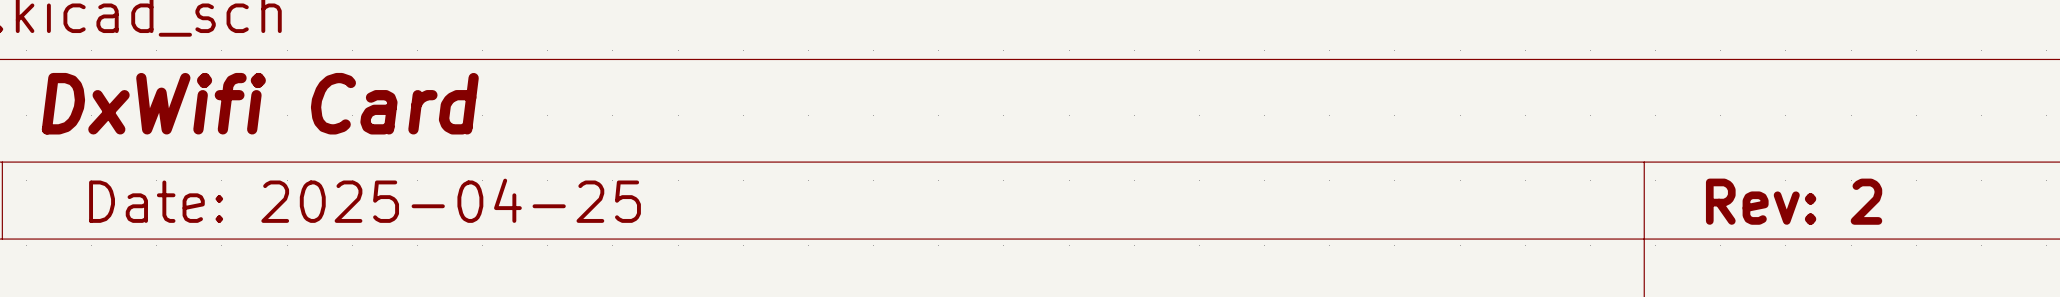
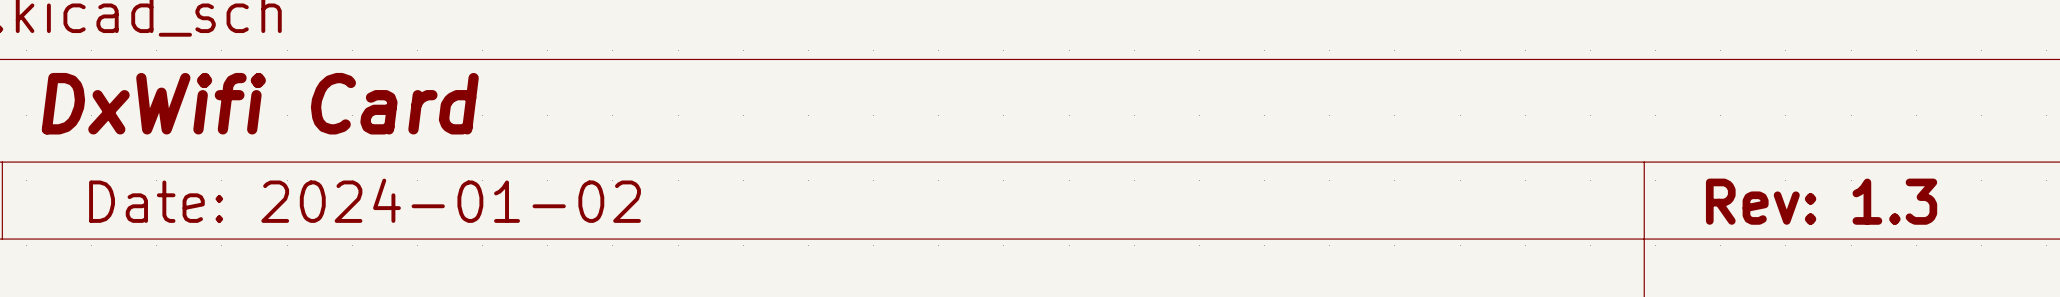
title block: Date: 2025-04-25 (365, 200) -> Date: 2024-01-02 (365, 200)
title block: Rev: 2 (1794, 201) -> Rev: 1.3 (1821, 201)

